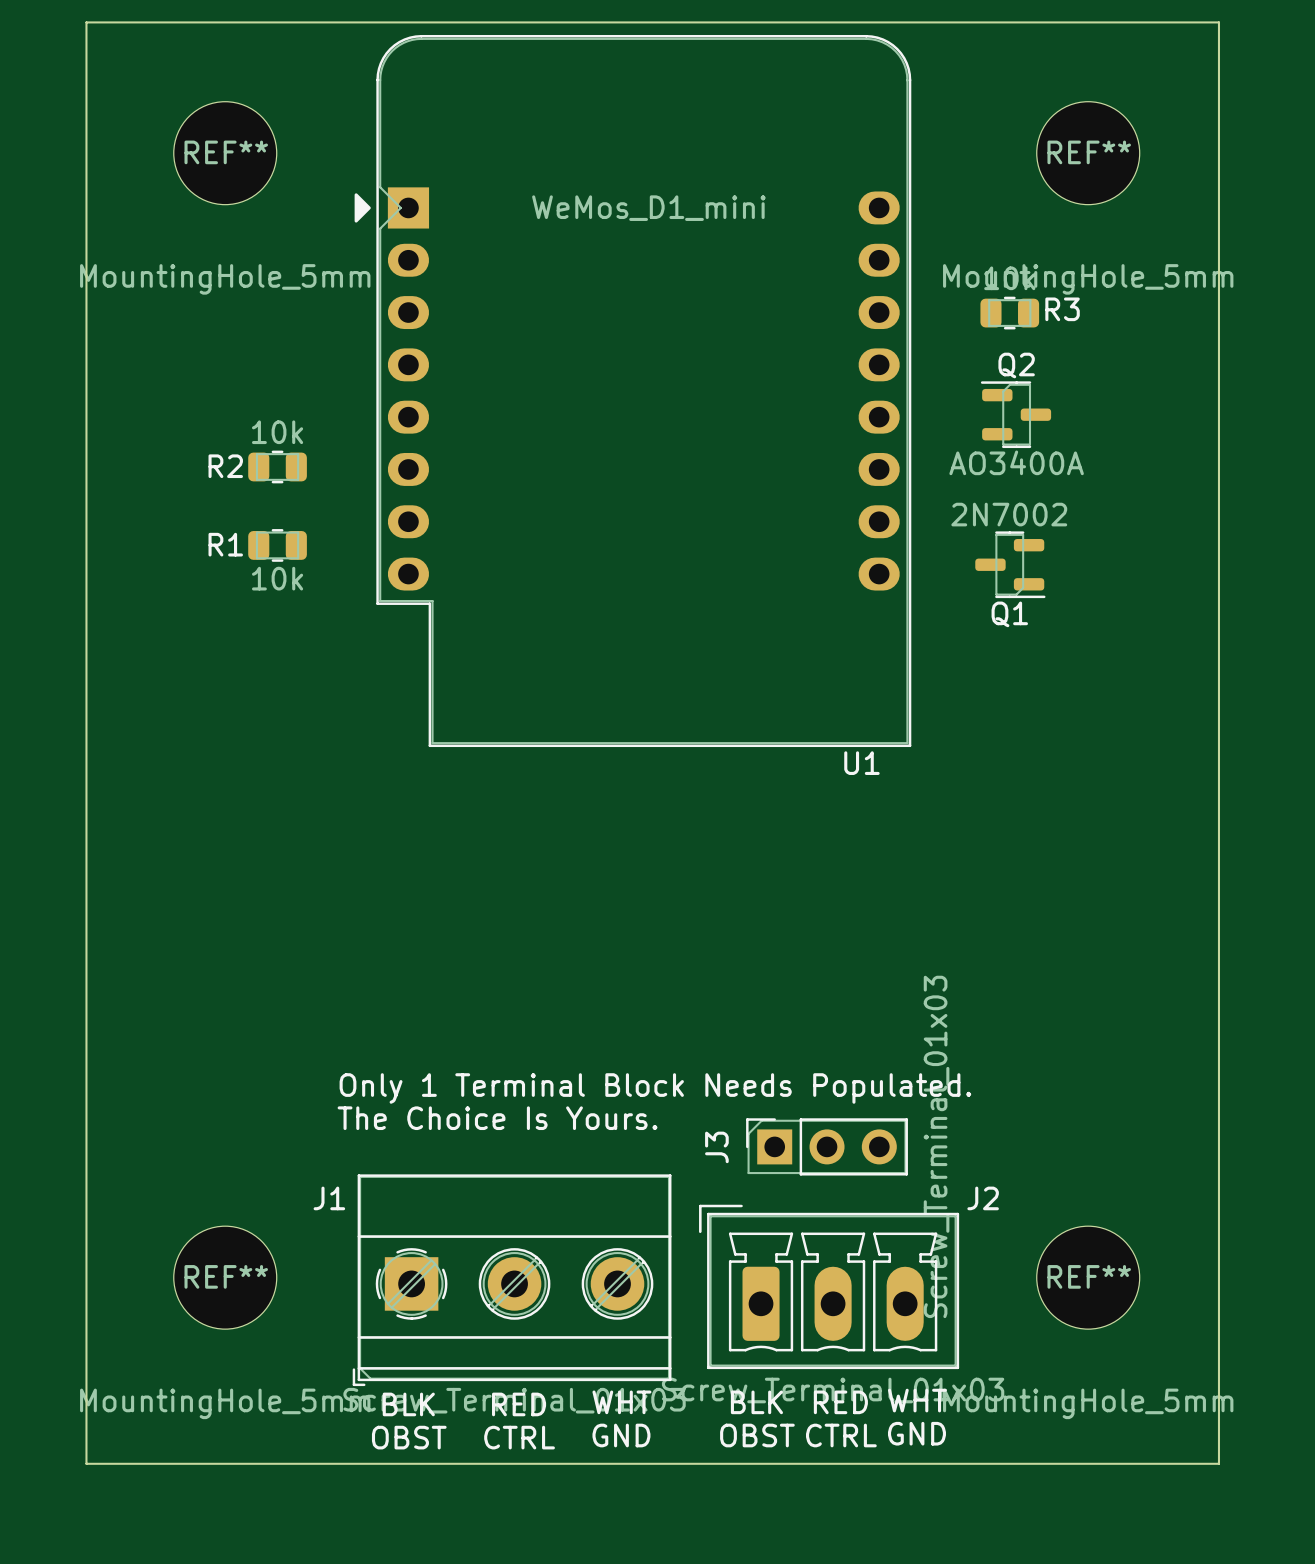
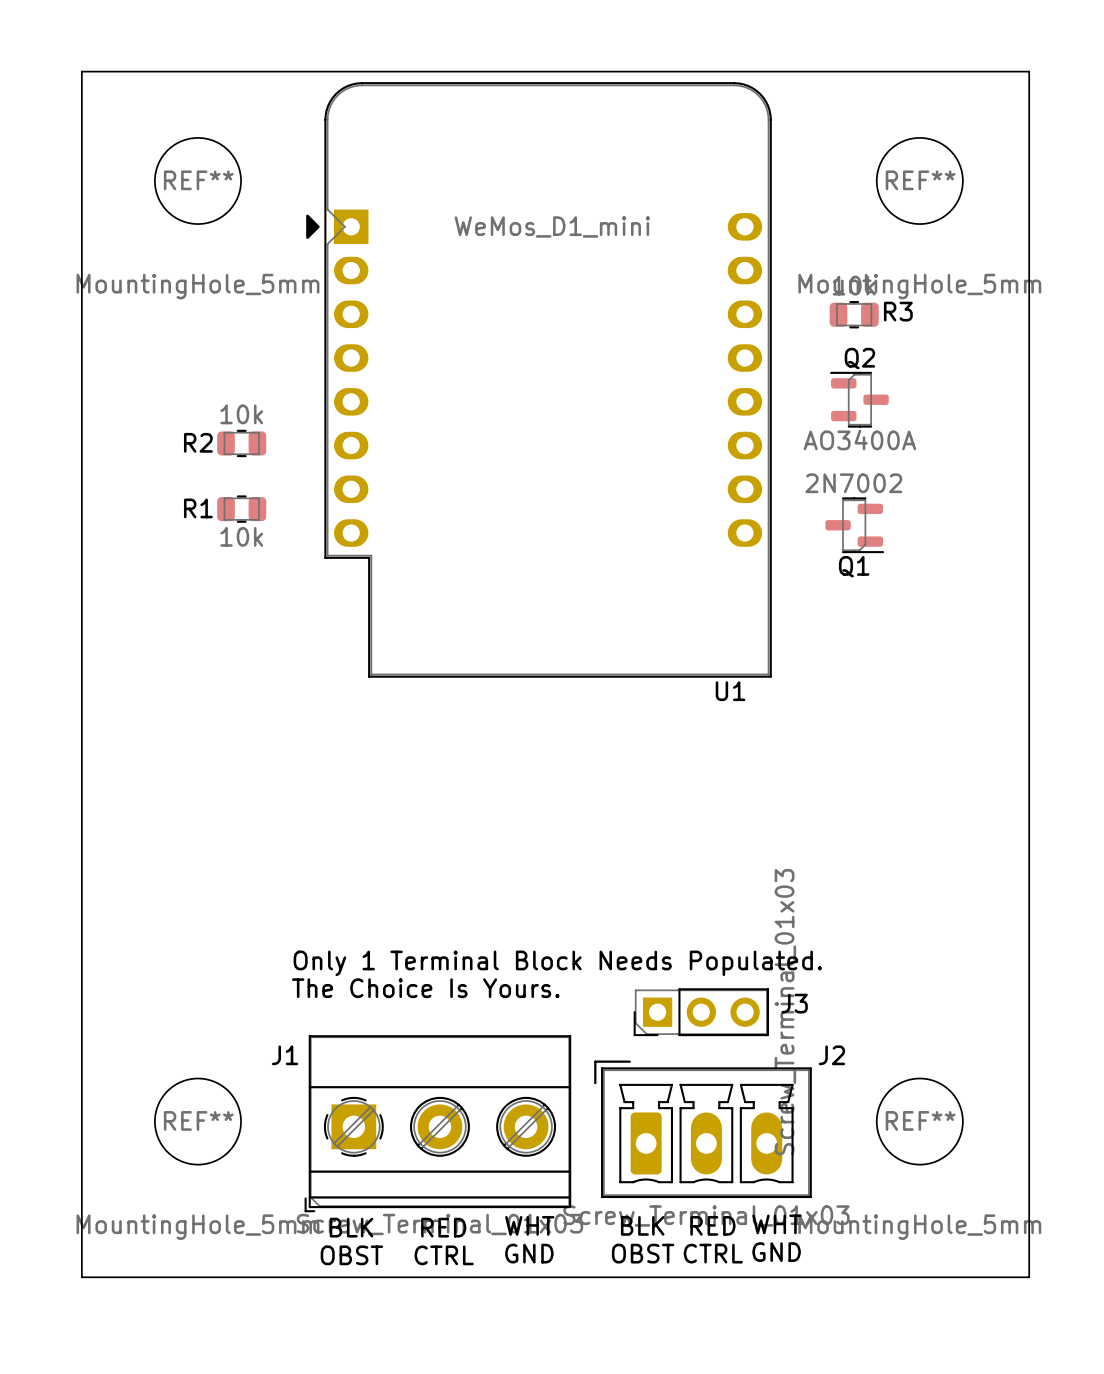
J3 footprint: [746, 1118, 908, 1176] -> [633, 988, 770, 1037]
J3 name position: J3 (716, 1147) -> J3 (794, 1003)

